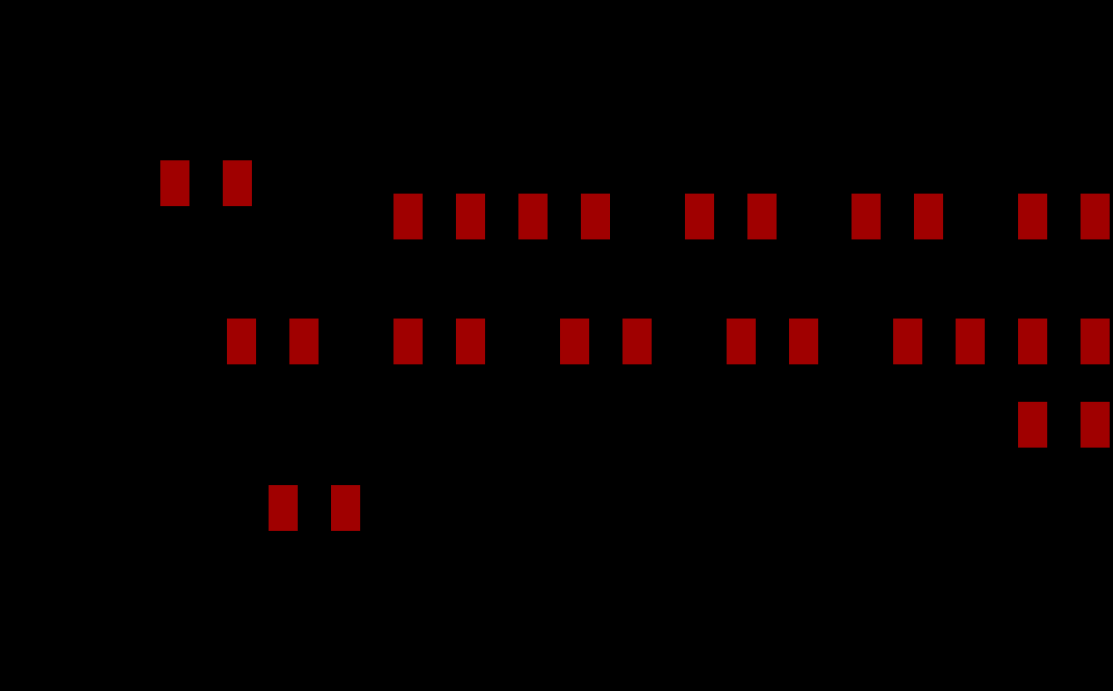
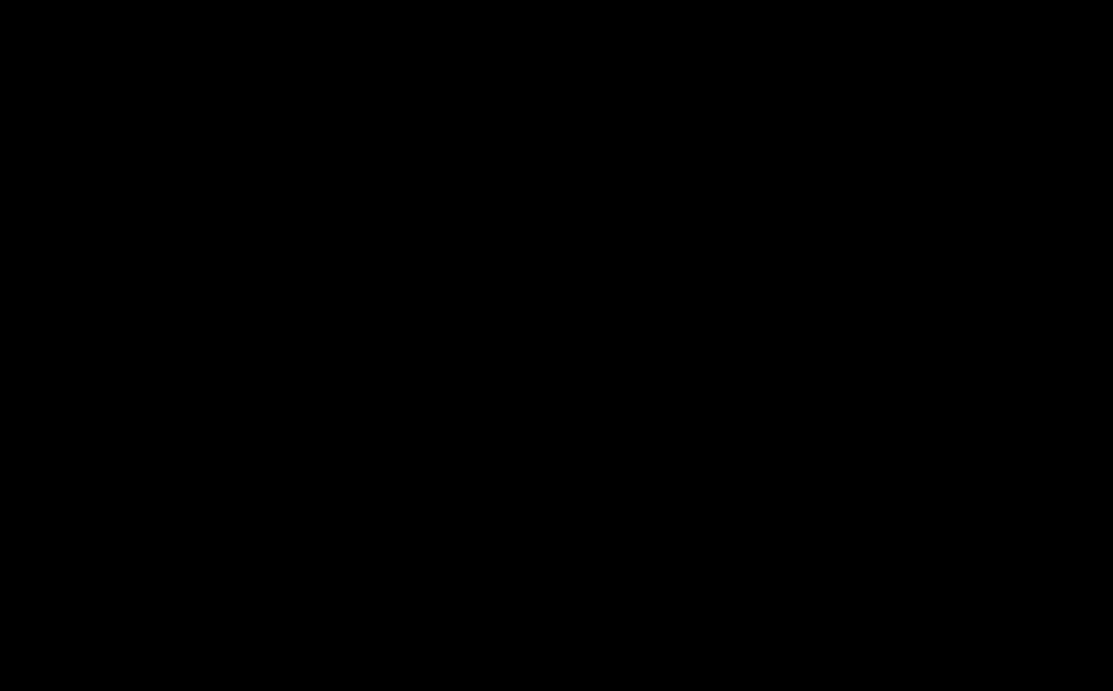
part: (206, 183) -> none
part: (439, 216) -> none
part: (564, 216) -> none
part: (730, 216) -> none
part: (897, 216) -> none
part: (1063, 216) -> none
part: (272, 341) -> none
part: (439, 341) -> none
part: (605, 341) -> none
part: (772, 341) -> none
part: (938, 341) -> none
part: (1063, 341) -> none
part: (1063, 424) -> none
part: (314, 507) -> none

